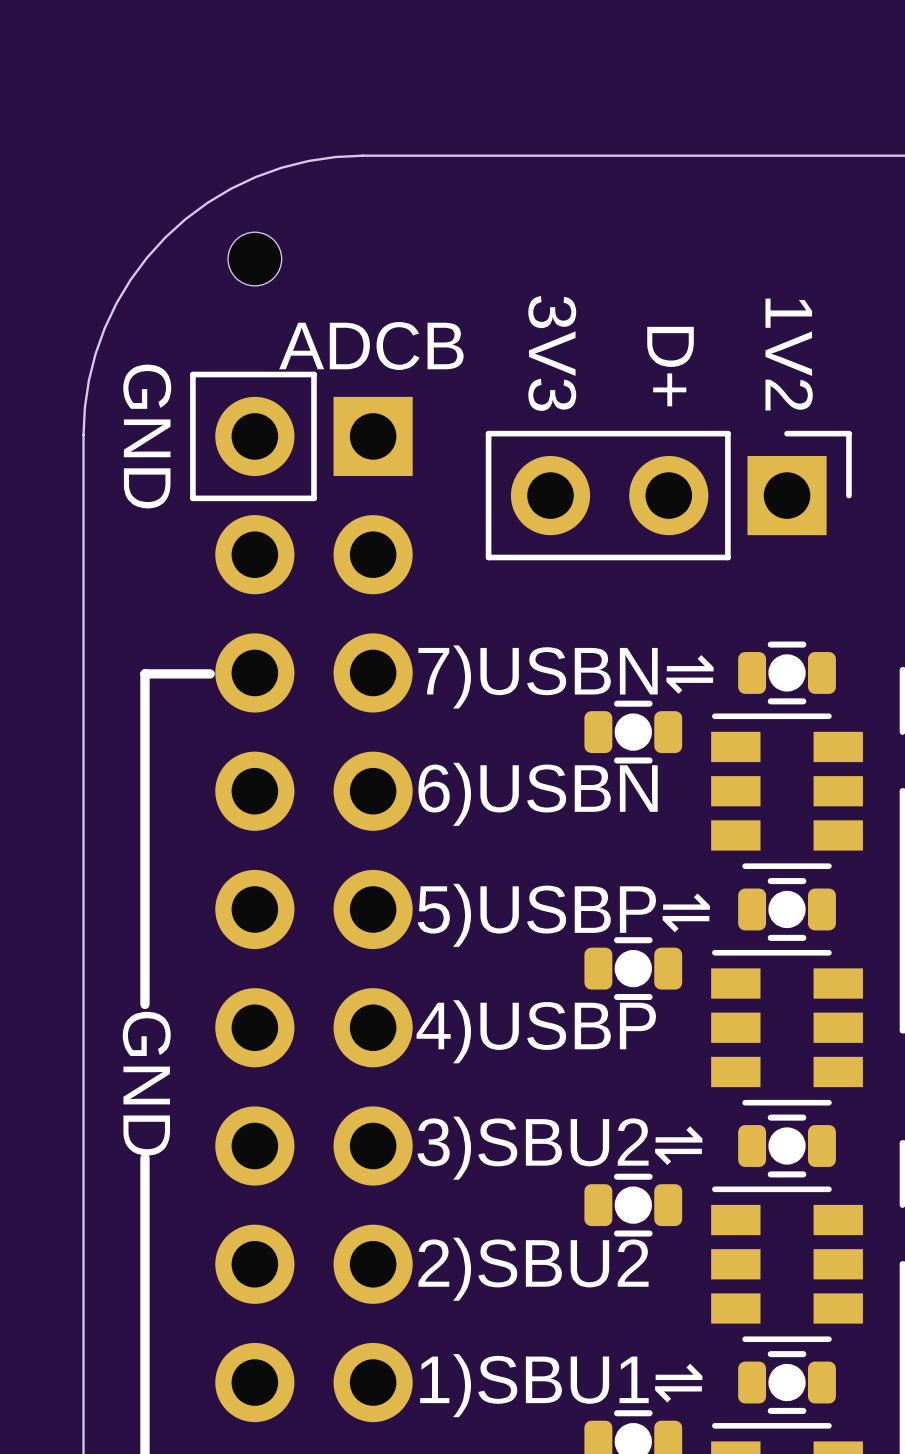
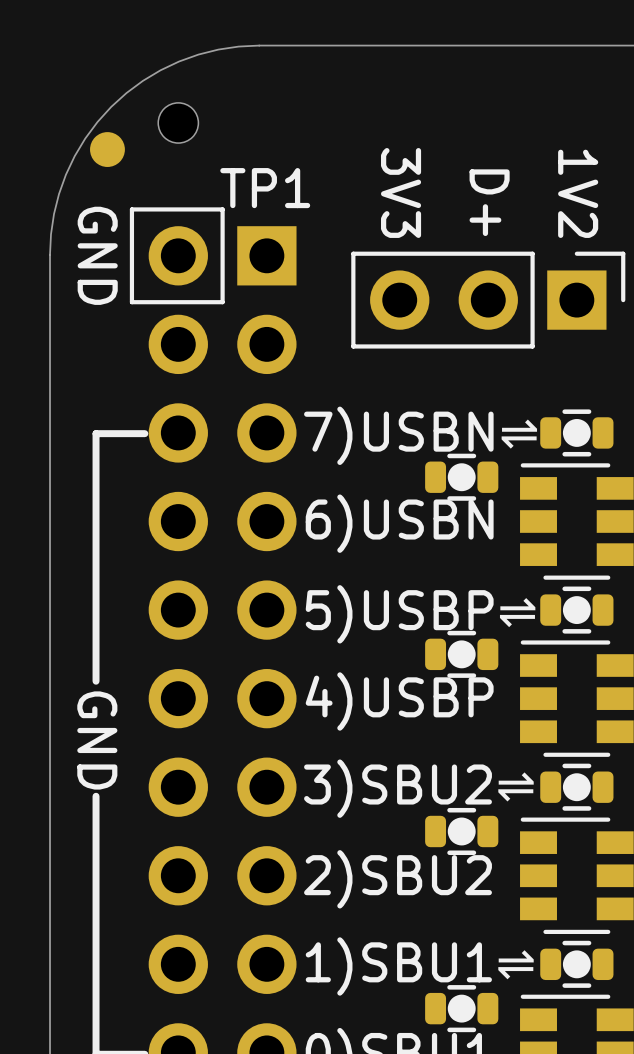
part: none -> (107, 149)
text: ADCB (371, 345) -> TP1 (265, 188)

